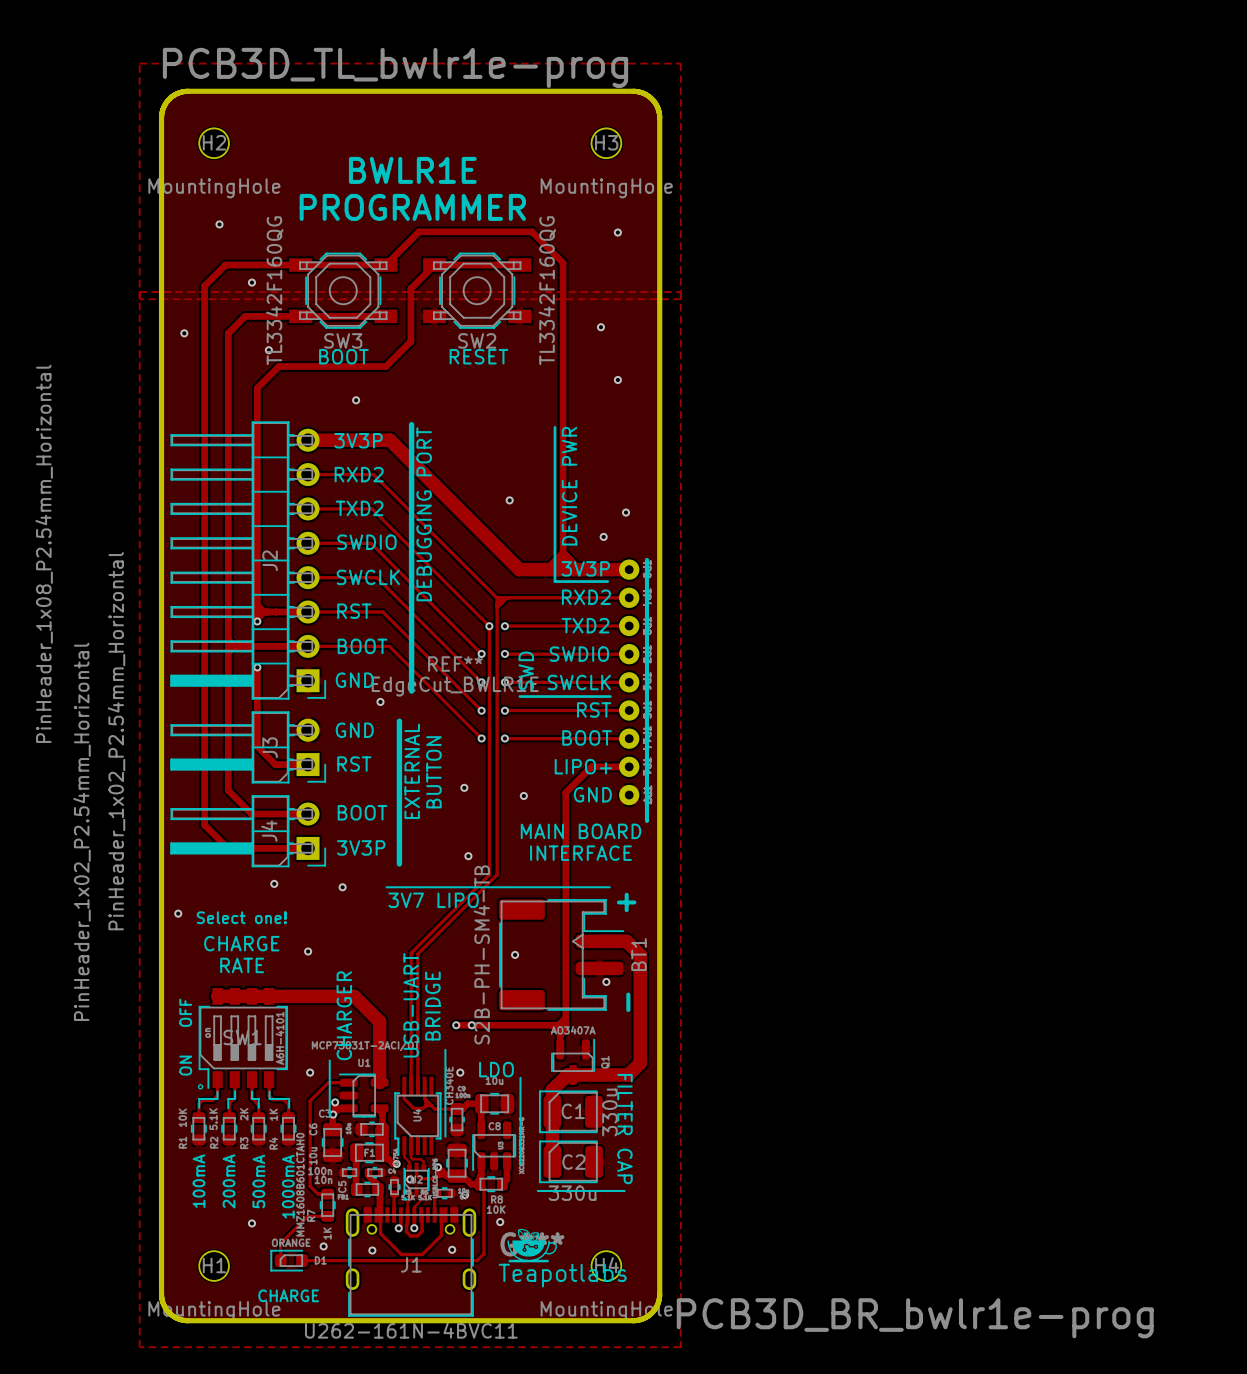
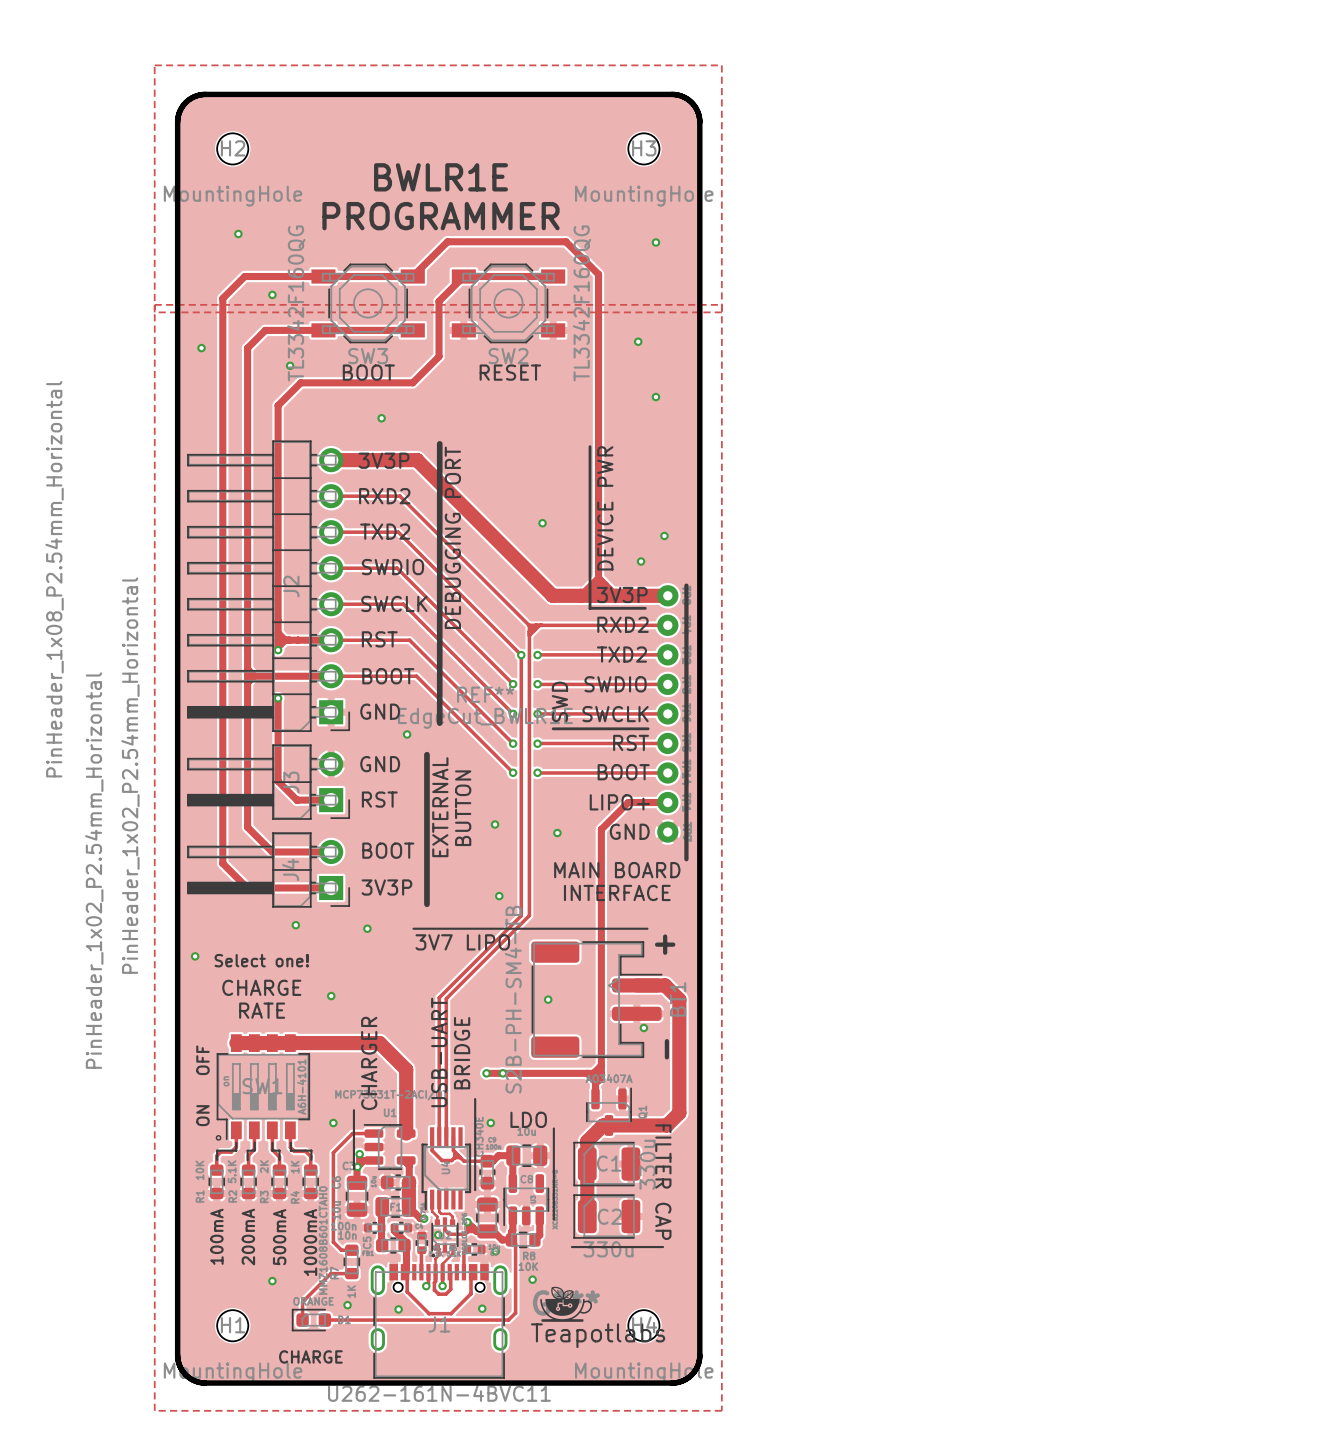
text: PCB3D_TL_bwlr1e-prog (395, 67) -> none
text: PCB3D_BR_bwlr1e-prog (915, 1318) -> none

